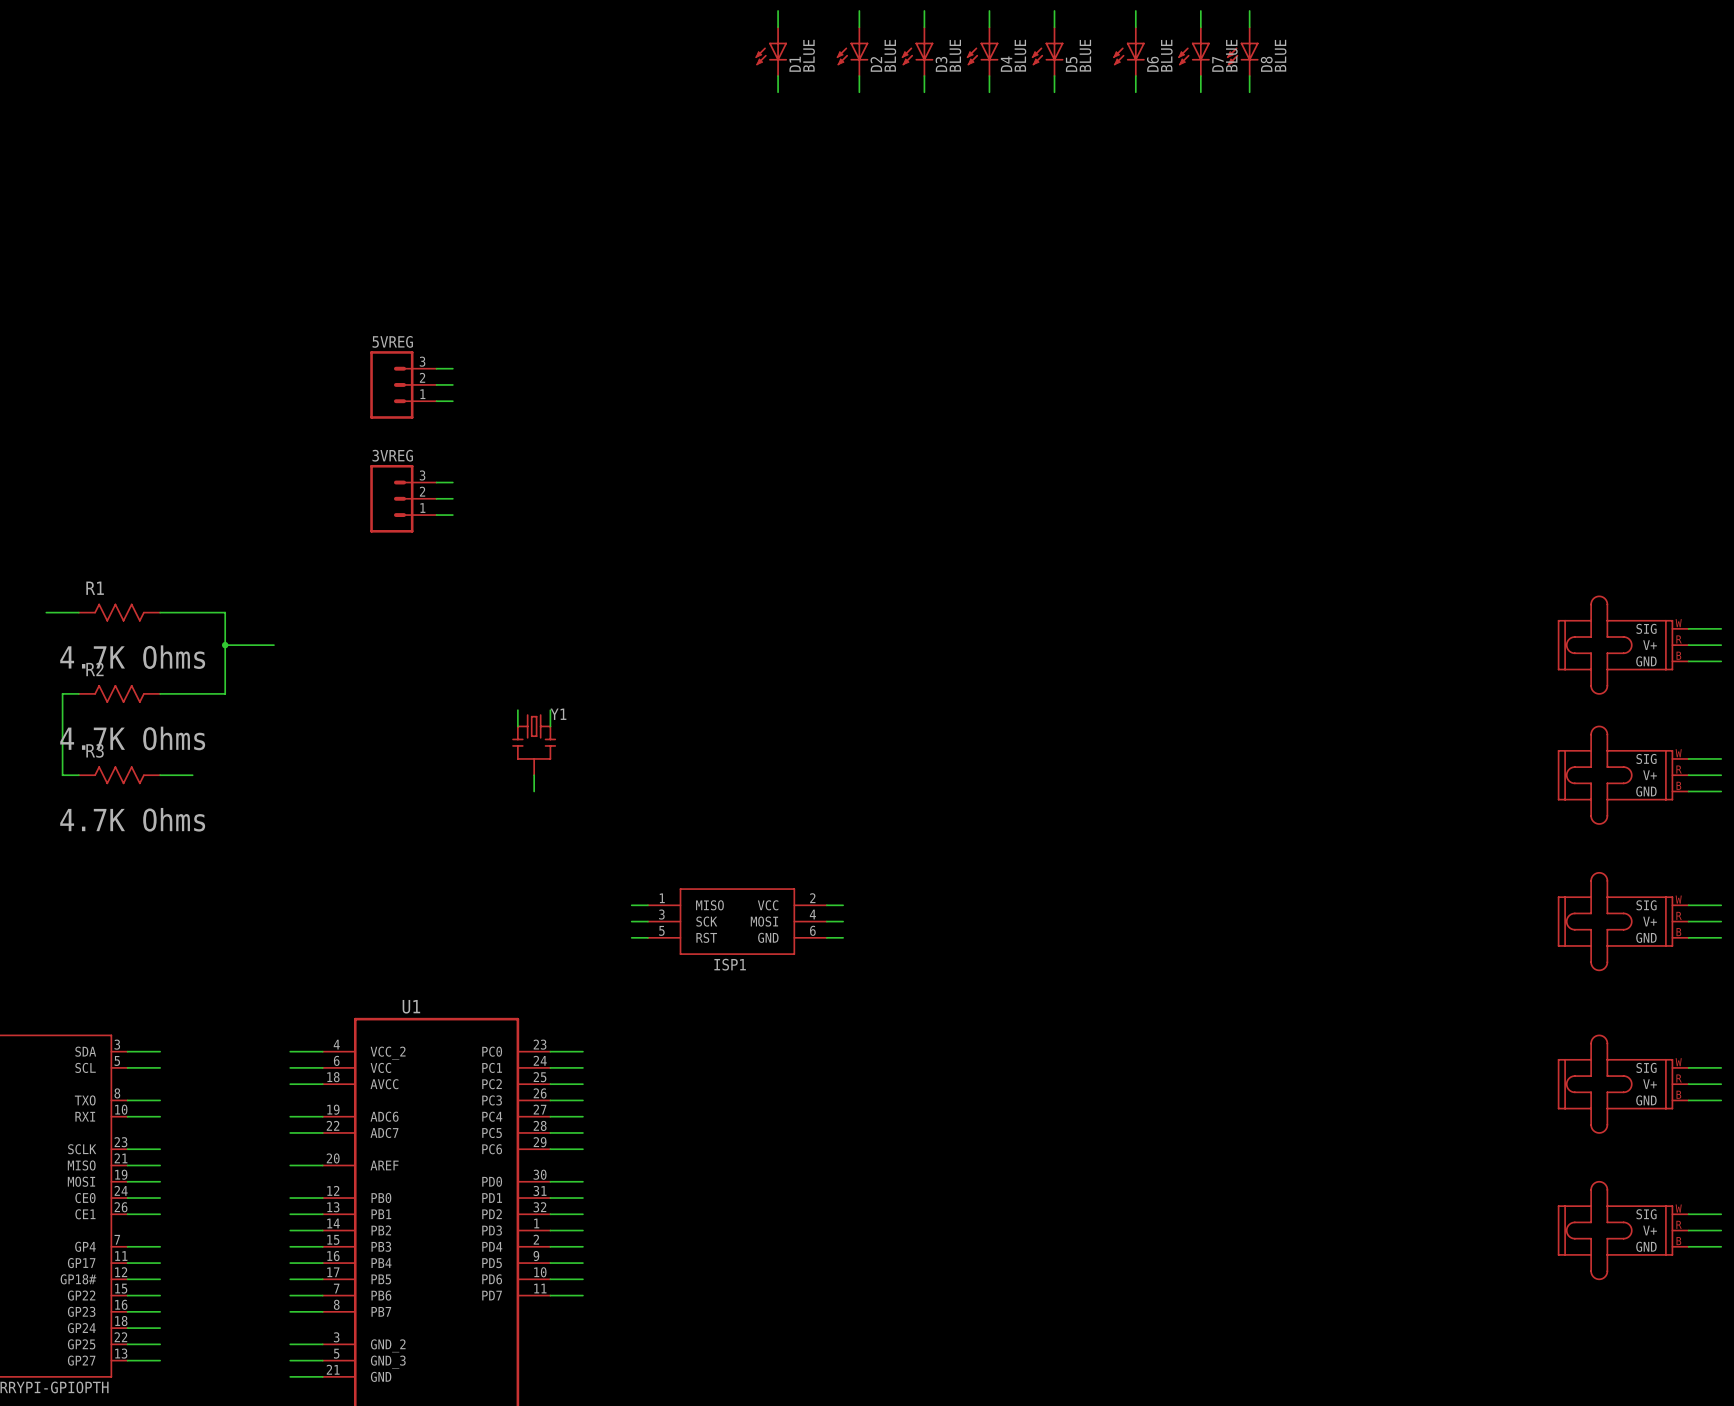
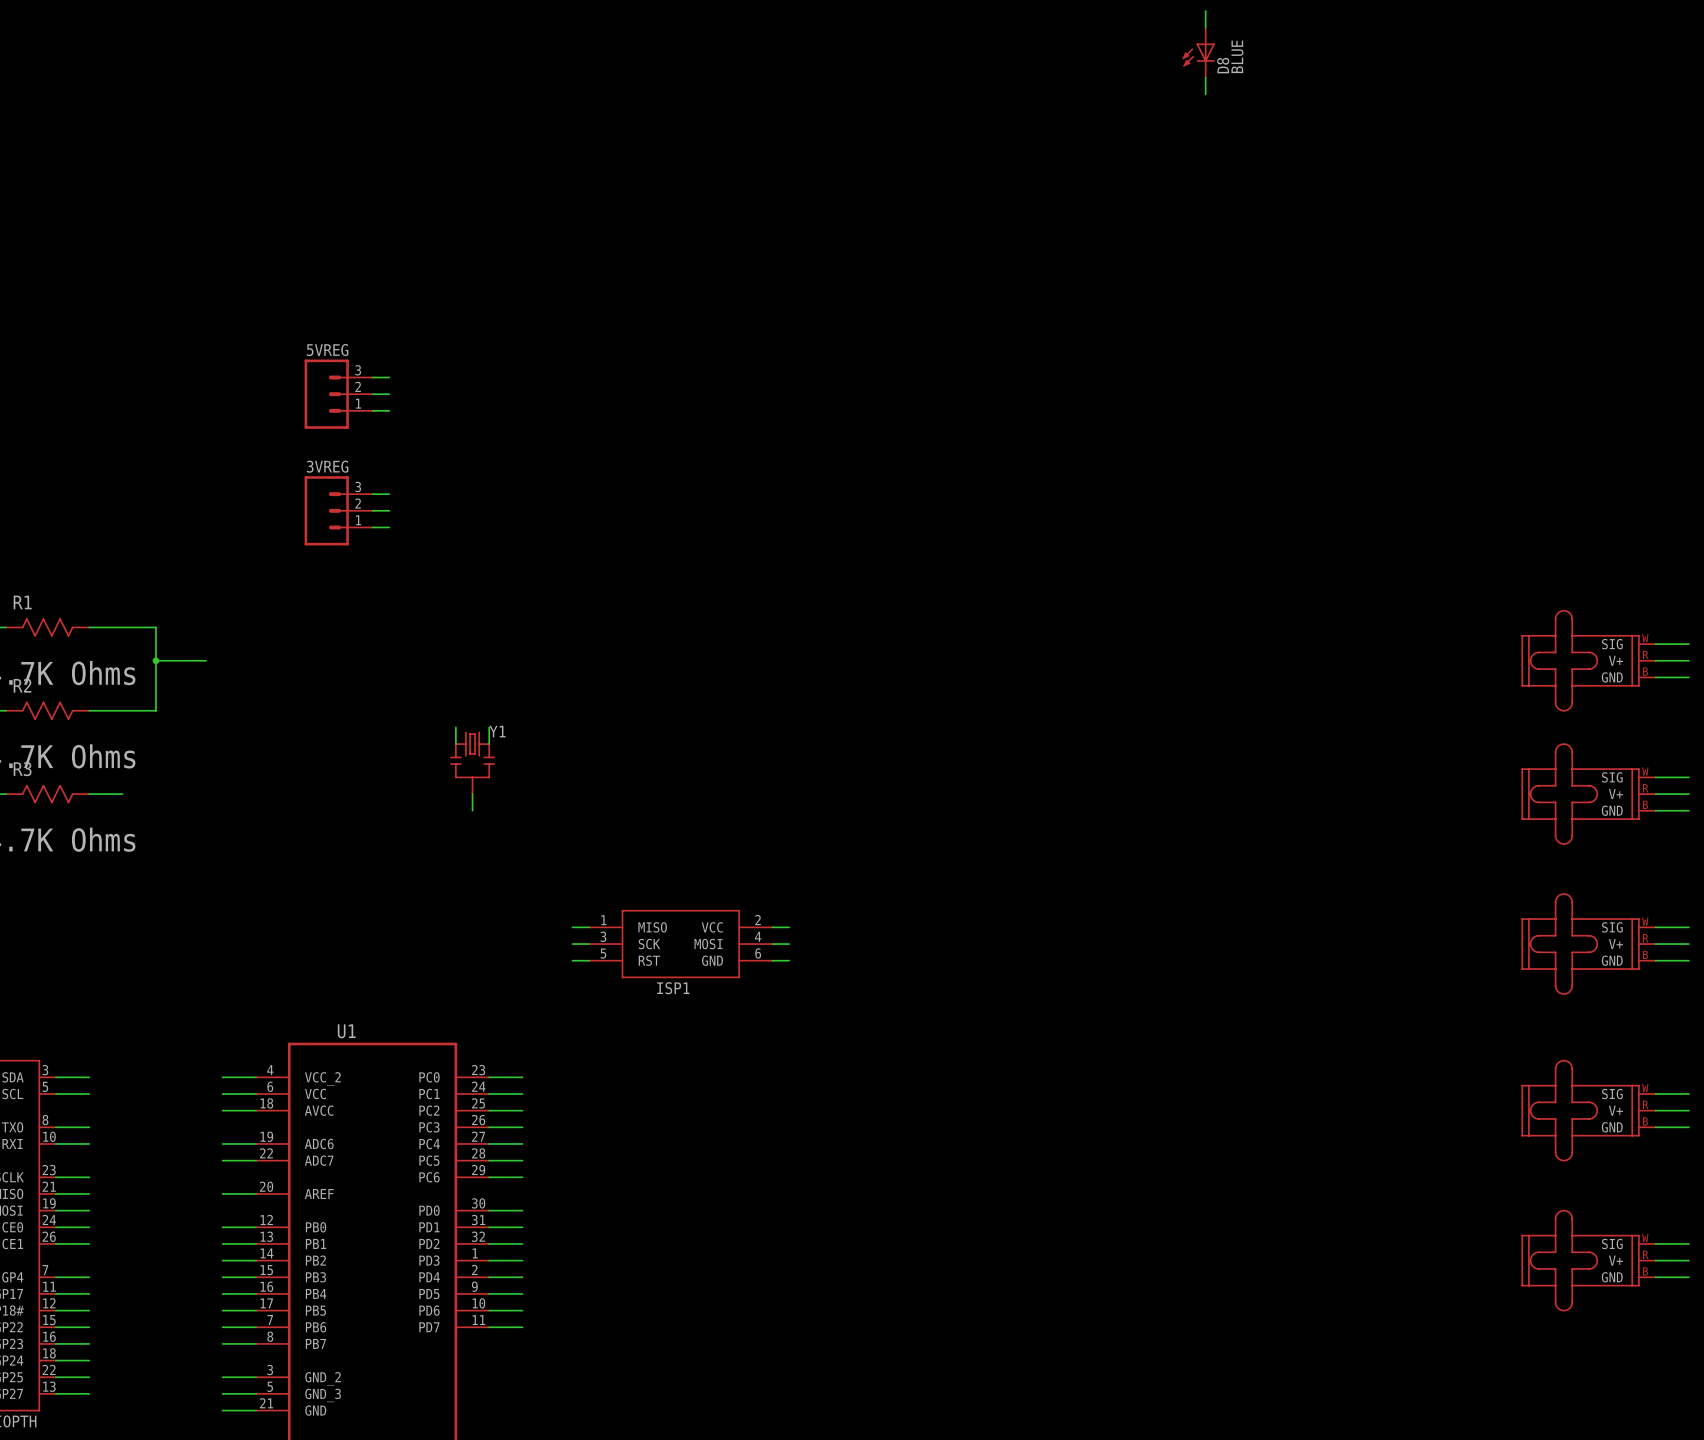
wire: (778, 10) (778, 27) -> none
wire: (859, 10) (859, 27) -> none
wire: (924, 10) (924, 27) -> none
wire: (989, 10) (989, 27) -> none
wire: (1054, 10) (1054, 27) -> none
wire: (1135, 10) (1135, 27) -> none
wire: (1200, 10) (1200, 27) -> none
D1: BLUE (771, 51) -> none
D2: BLUE (852, 51) -> none
D3: BLUE (917, 51) -> none
D4: BLUE (982, 51) -> none
D5: BLUE (1047, 51) -> none
D6: BLUE (1129, 51) -> none
D7: BLUE (1194, 51) -> none
wire: (778, 76) (778, 92) -> none
wire: (859, 76) (859, 92) -> none
wire: (924, 76) (924, 92) -> none
wire: (989, 76) (989, 92) -> none
wire: (1054, 76) (1054, 92) -> none
wire: (1135, 76) (1135, 92) -> none
wire: (1200, 76) (1200, 92) -> none

